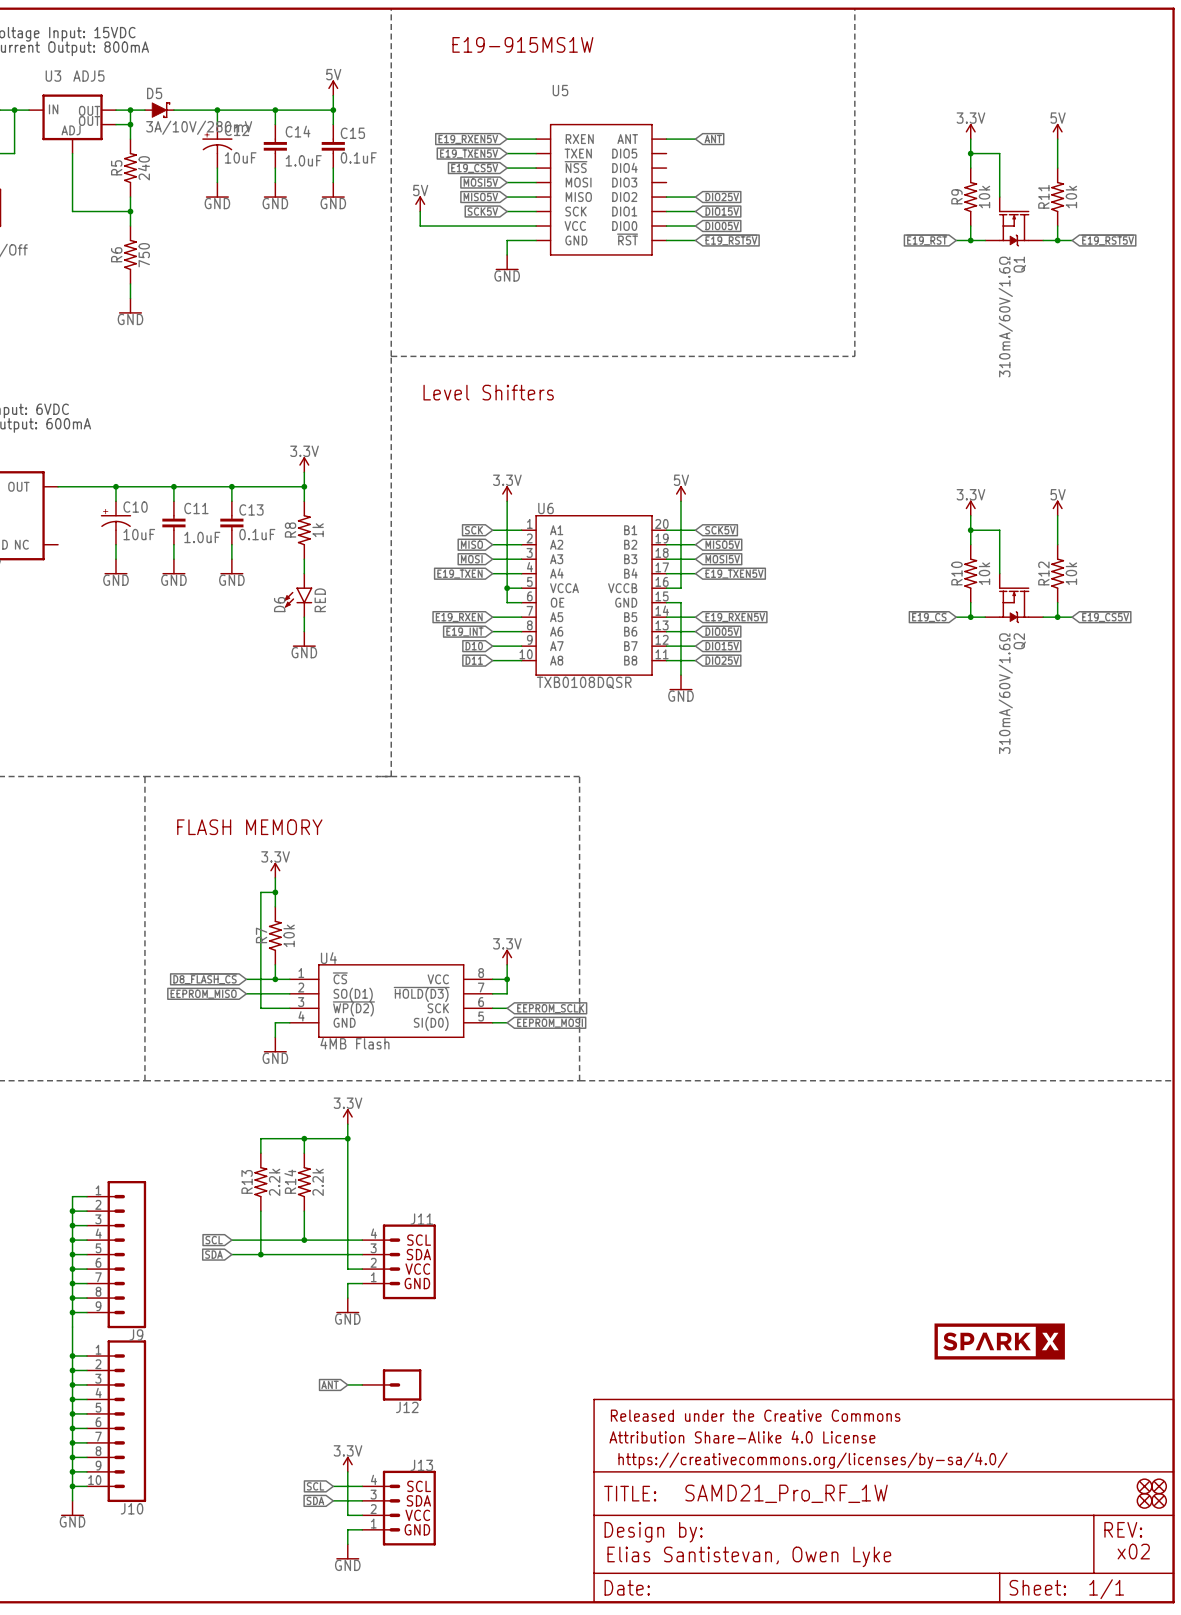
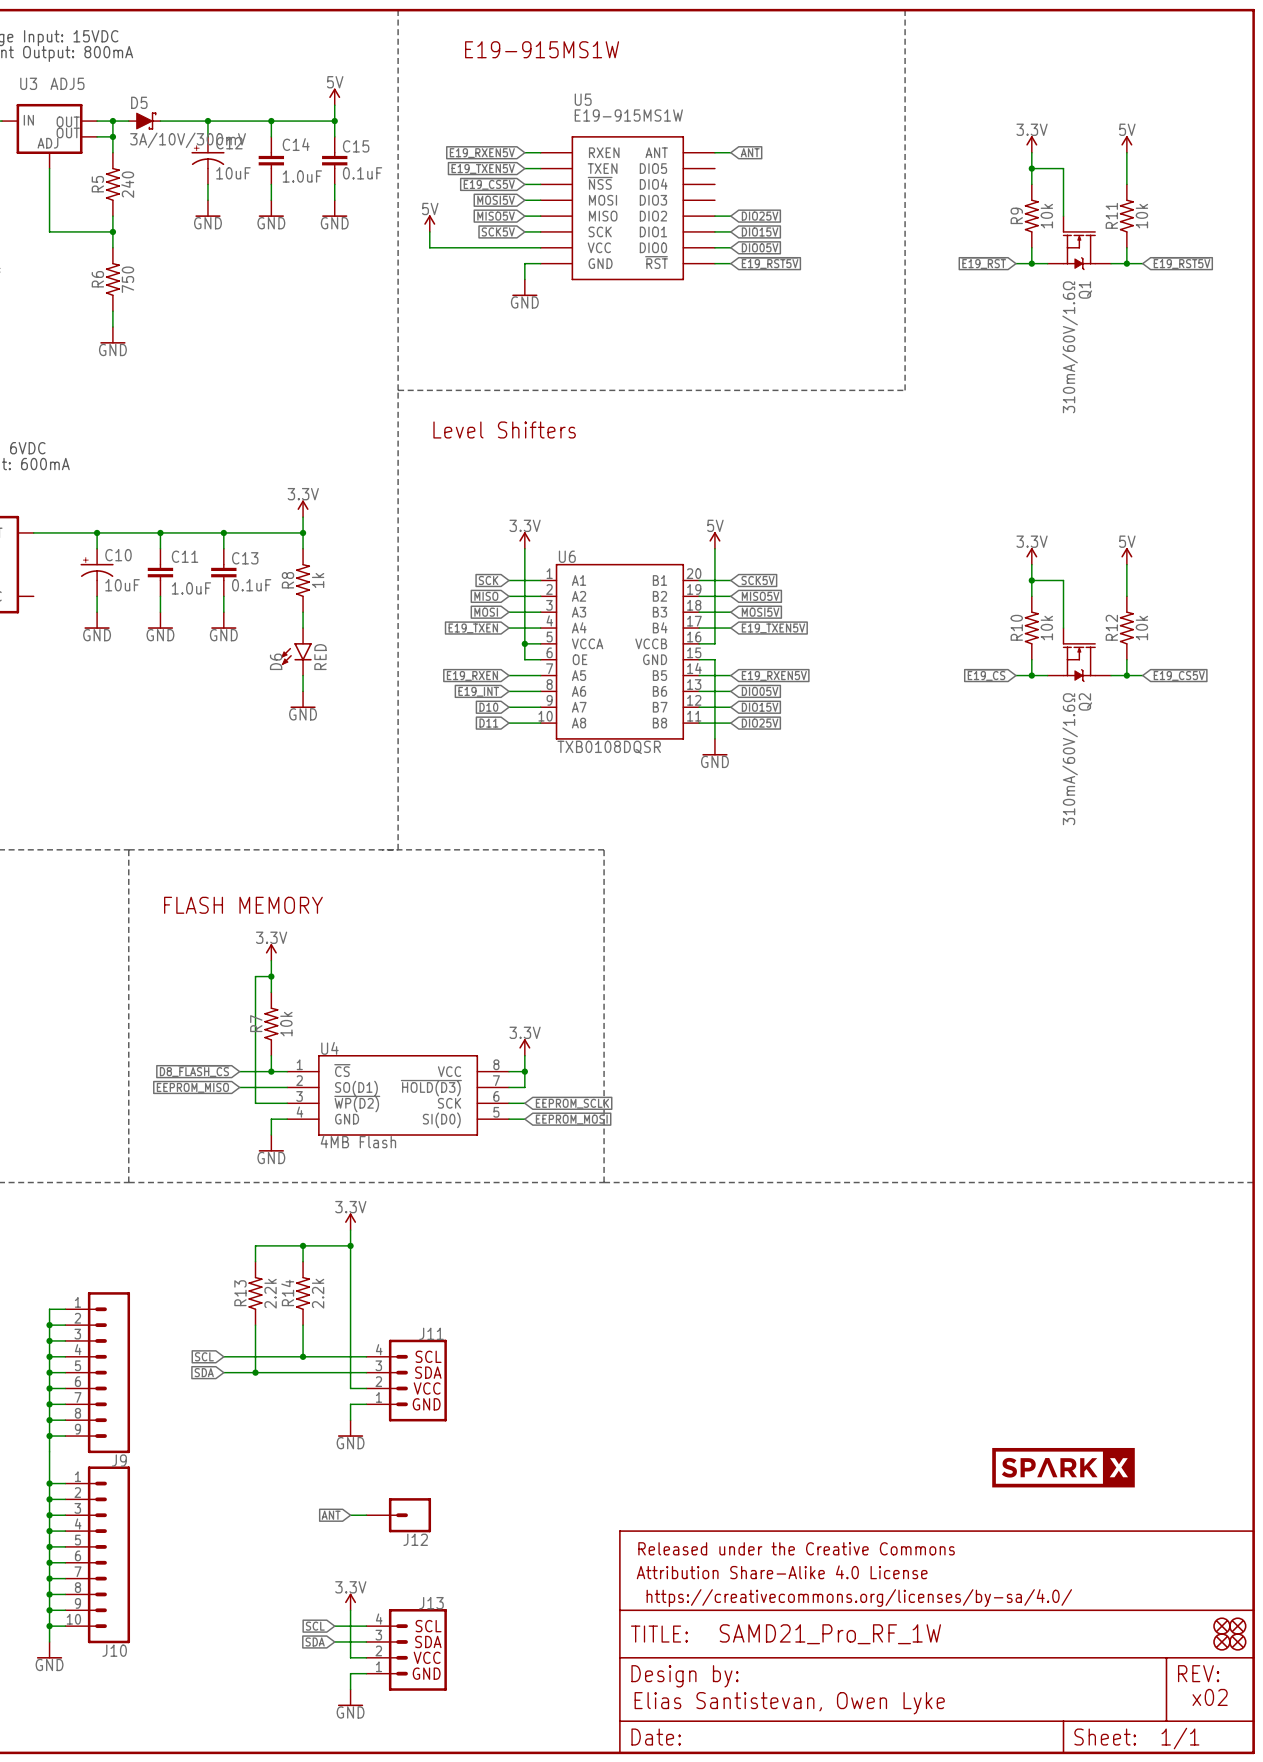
U5 value: none -> E19-915MS1W (628, 115)
U5 symbol: [536, 123, 667, 256] -> [540, 136, 715, 281]
D5 value: 3A/10V/280mV (199, 127) -> 3A/10V/300mV (188, 140)

